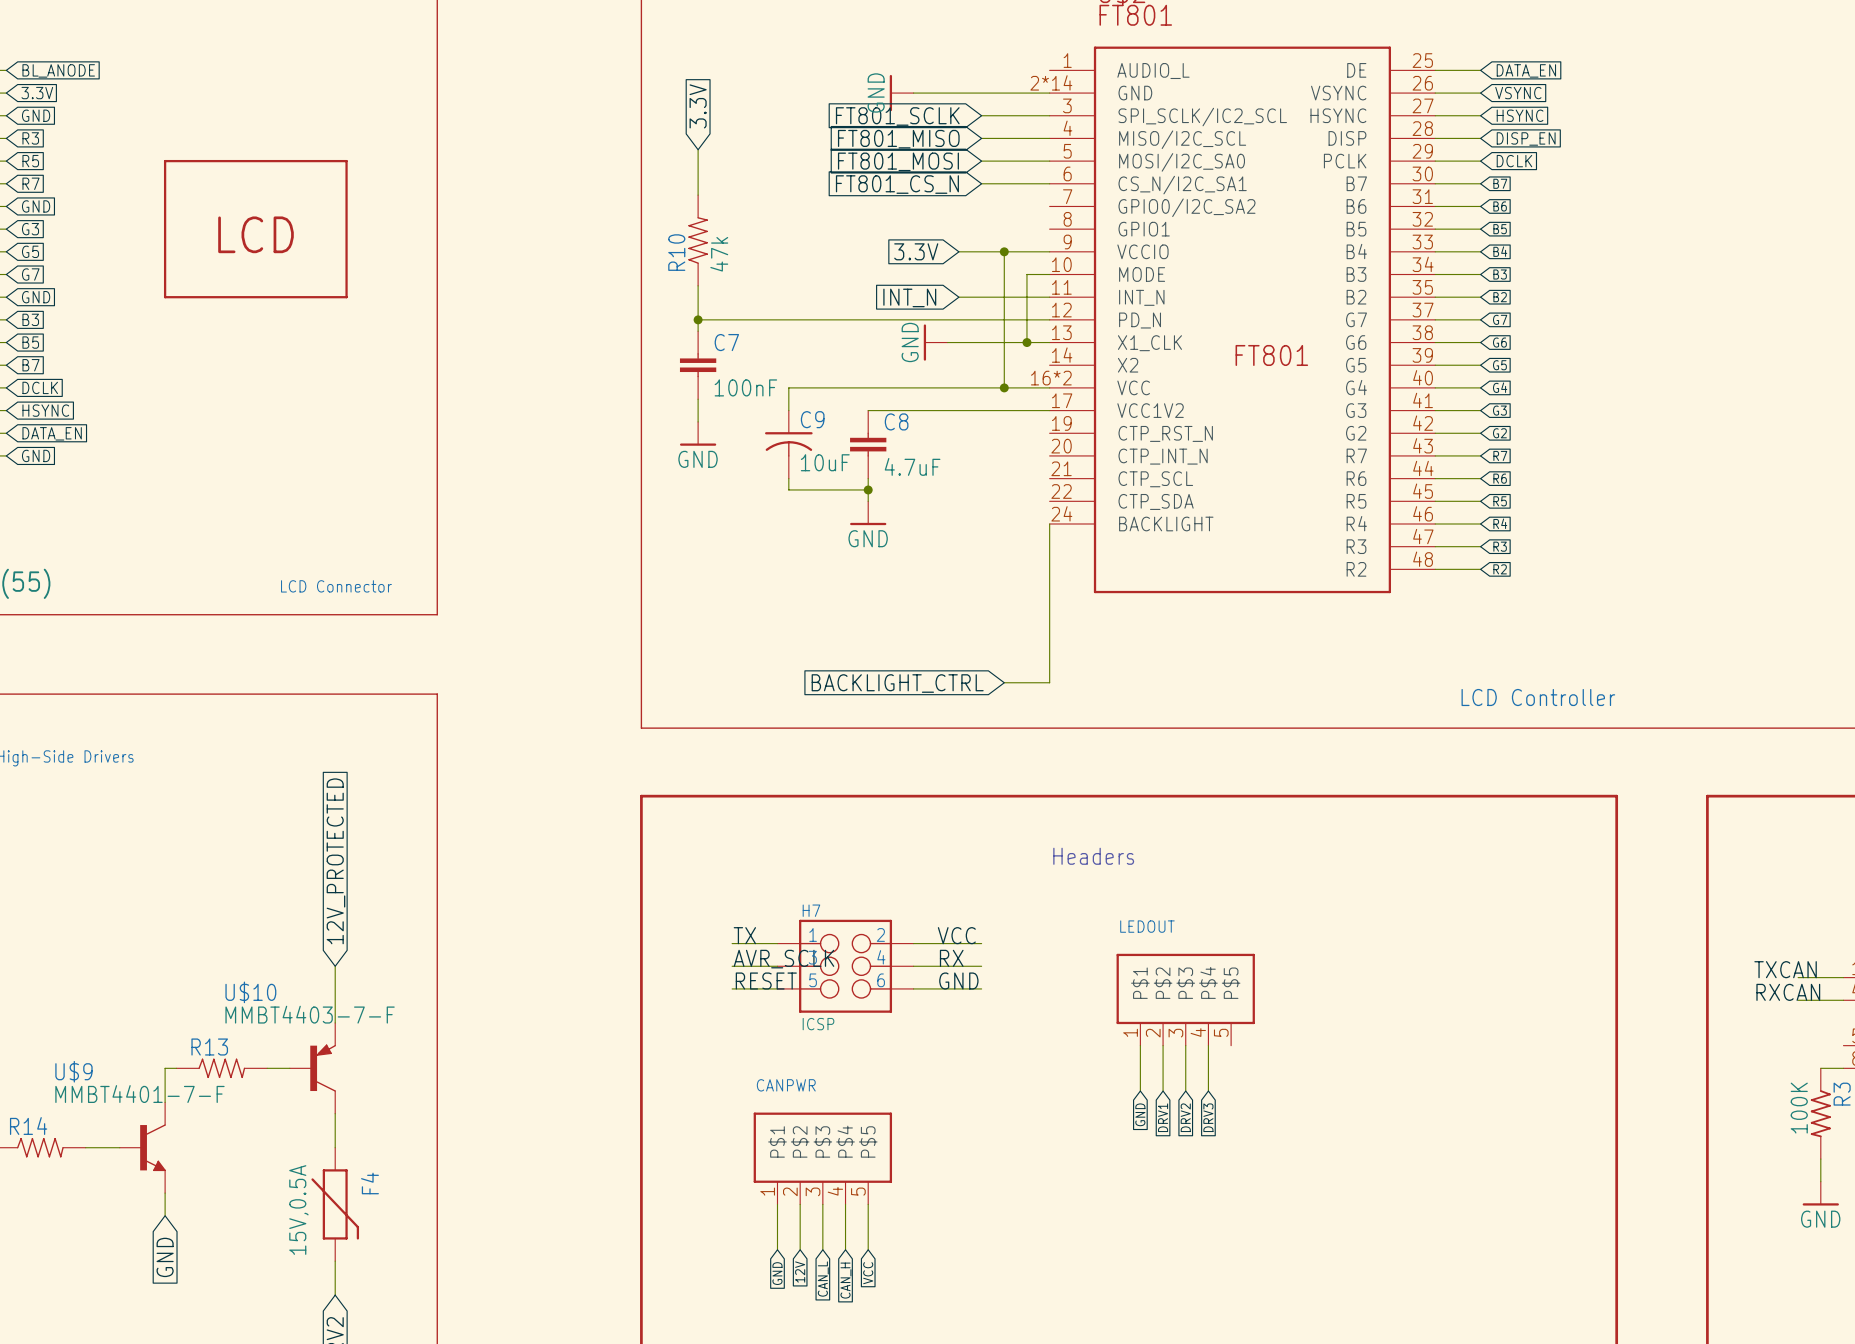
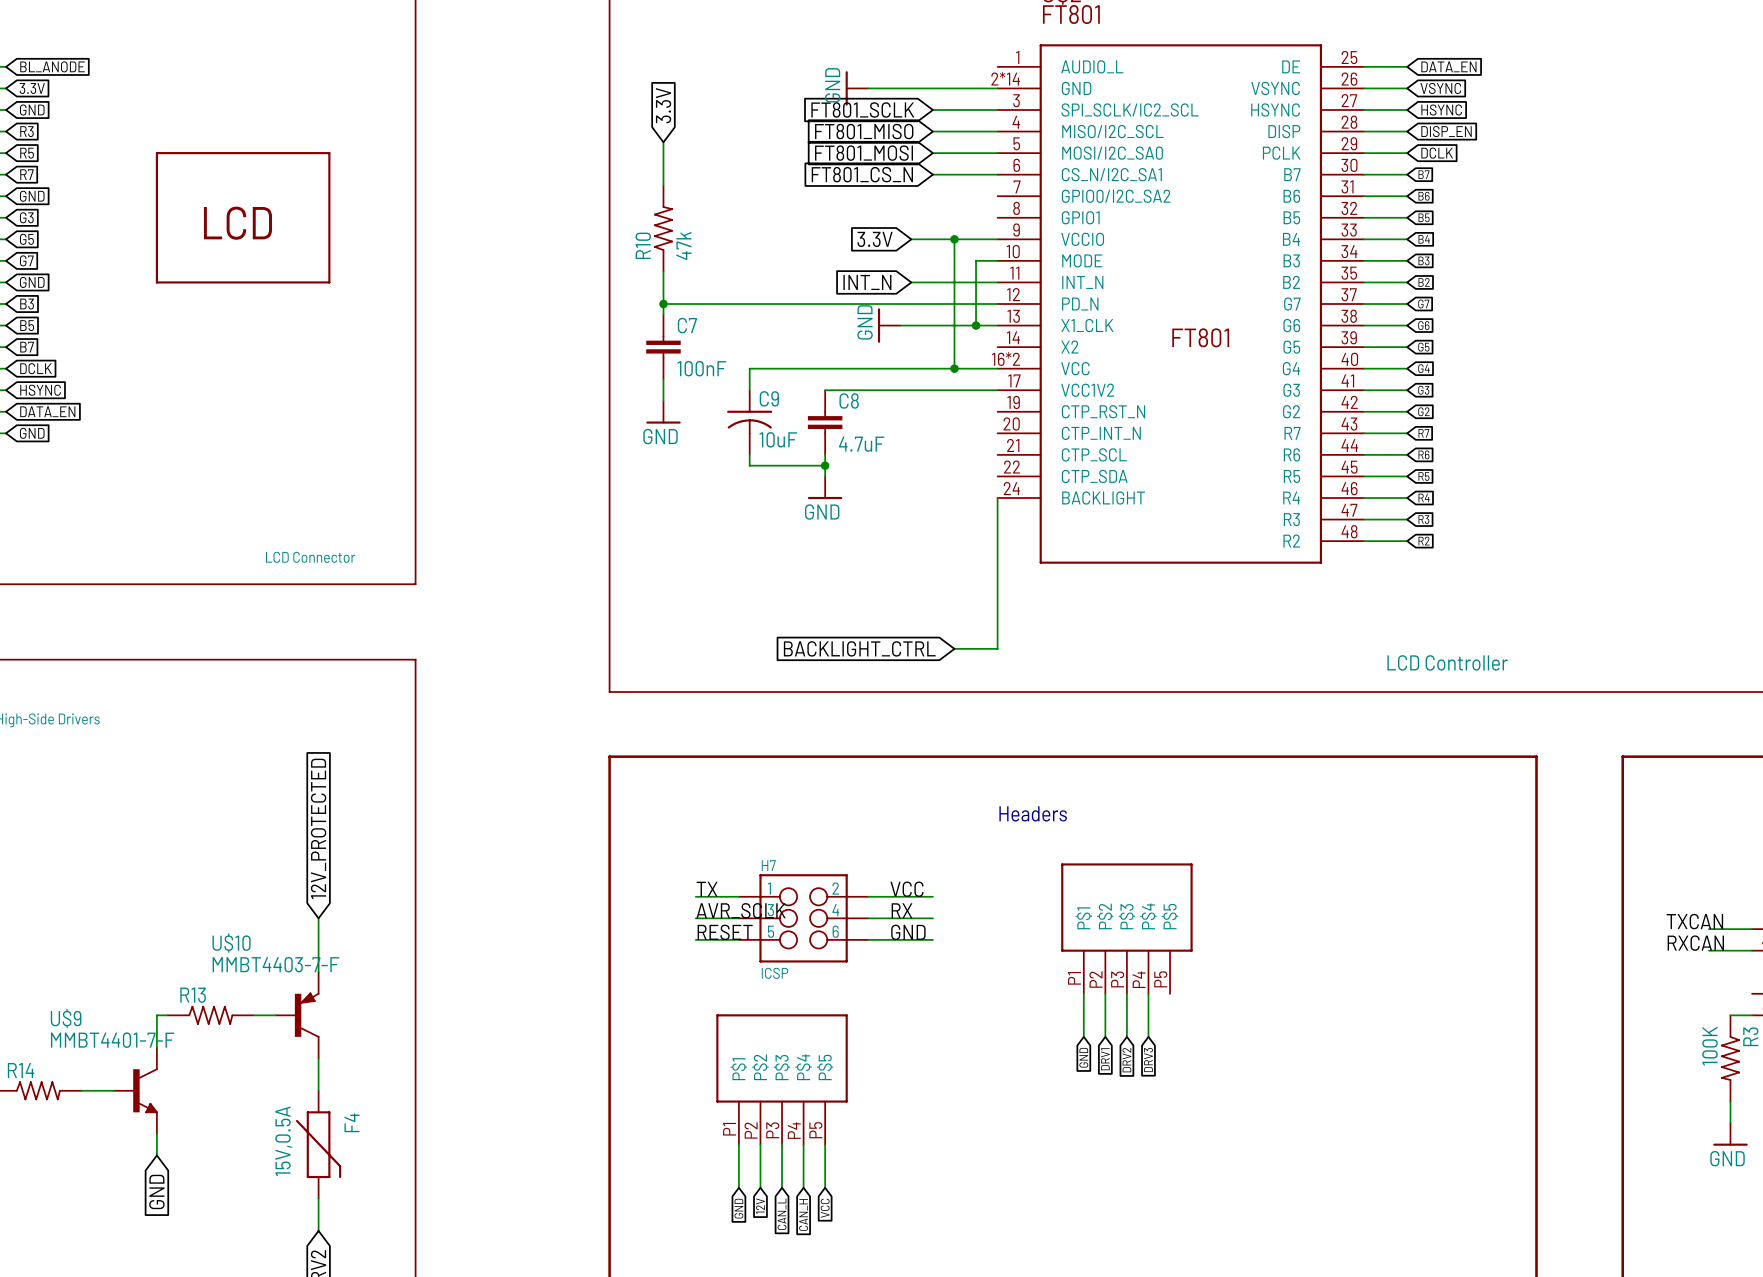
part: none -> (1126, 928)
LEDOUT: (1185, 999) -> none
part: none -> (782, 1079)
CANPWR: (822, 1158) -> none

